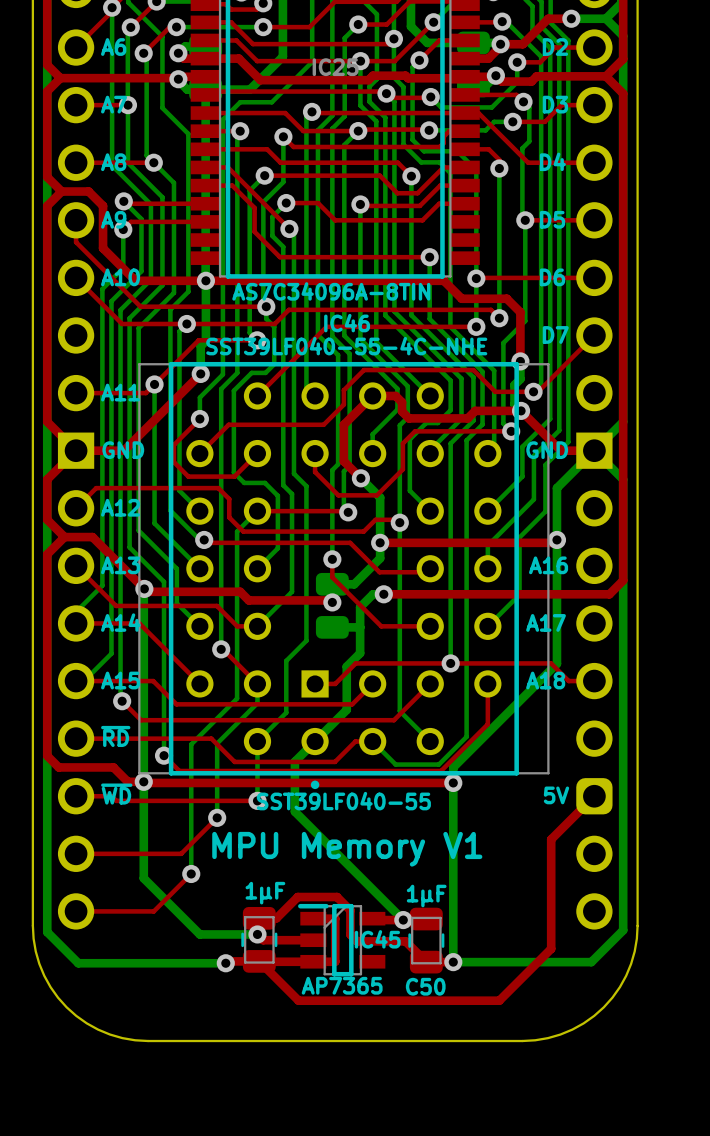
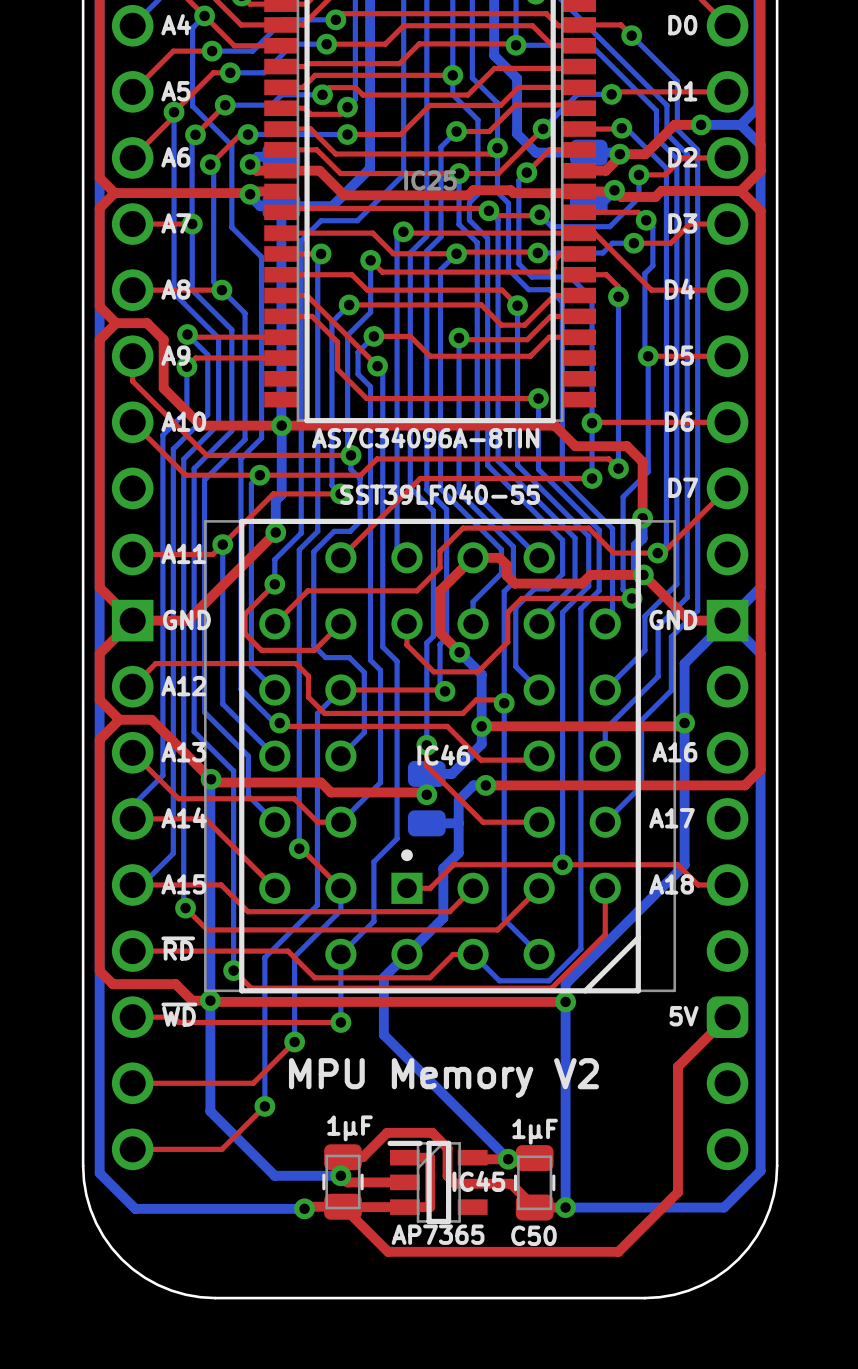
IC46 name position: IC46 (347, 323) -> IC46 (443, 755)
IC46 value: SST39LF040-55-4C-NHE (346, 346) -> none
IC46 footprint: [138, 361, 550, 790] -> [204, 518, 677, 994]
text: MPU Memory V1 (347, 849) -> MPU Memory V2 (443, 1078)

